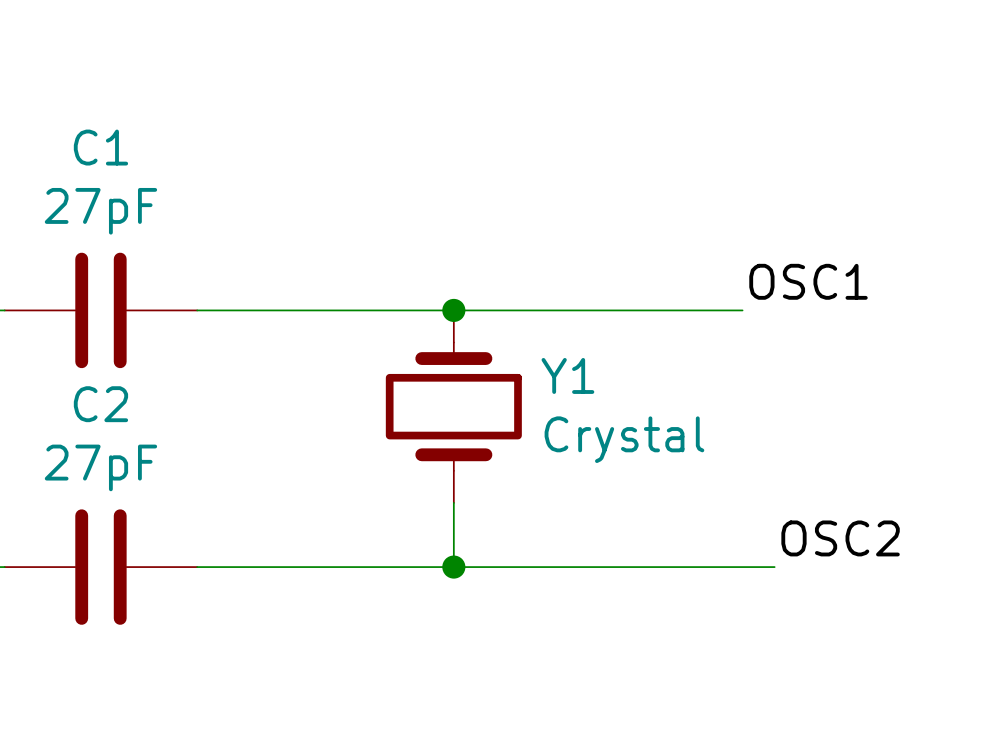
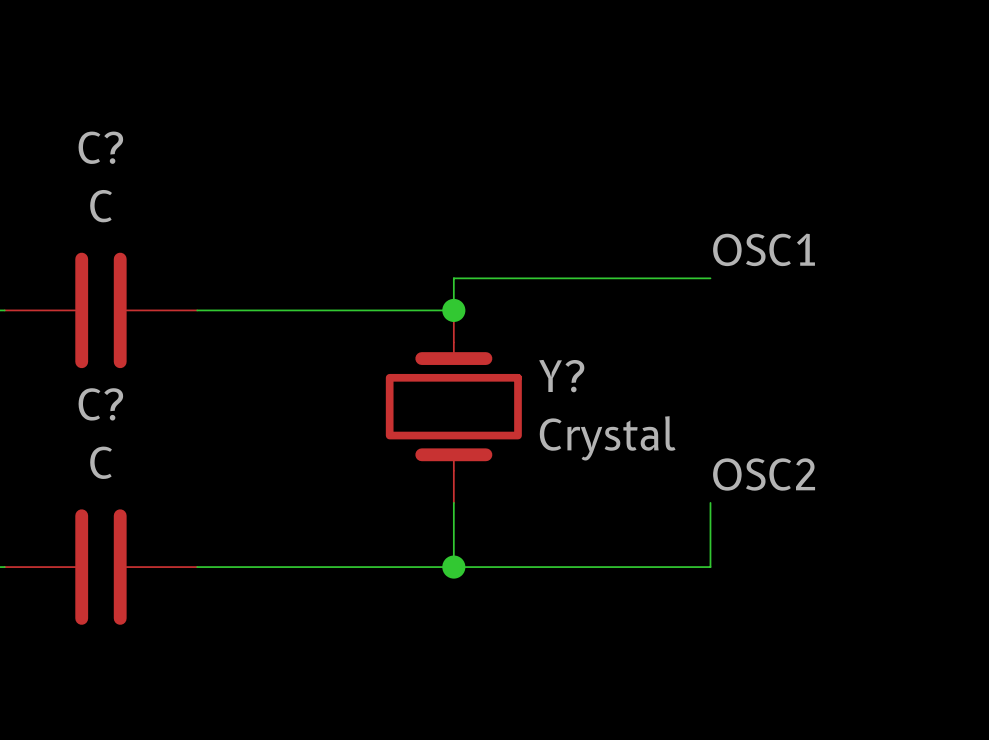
C1 name: C1 (100, 147) -> C? (100, 147)
C1 value: 27pF (100, 211) -> C (101, 206)
label position: OSC1 (808, 281) -> OSC1 (764, 249)
wire: (453, 310) (742, 310) -> (453, 310) (453, 278) (710, 278)
Y1 name: Y1 (567, 375) -> Y? (561, 376)
C2 name: C2 (100, 404) -> C? (100, 404)
C2 value: 27pF (100, 467) -> C (101, 462)
label position: OSC2 (840, 538) -> OSC2 (764, 474)
wire: (710, 567) (774, 567) -> (710, 567) (710, 502)

